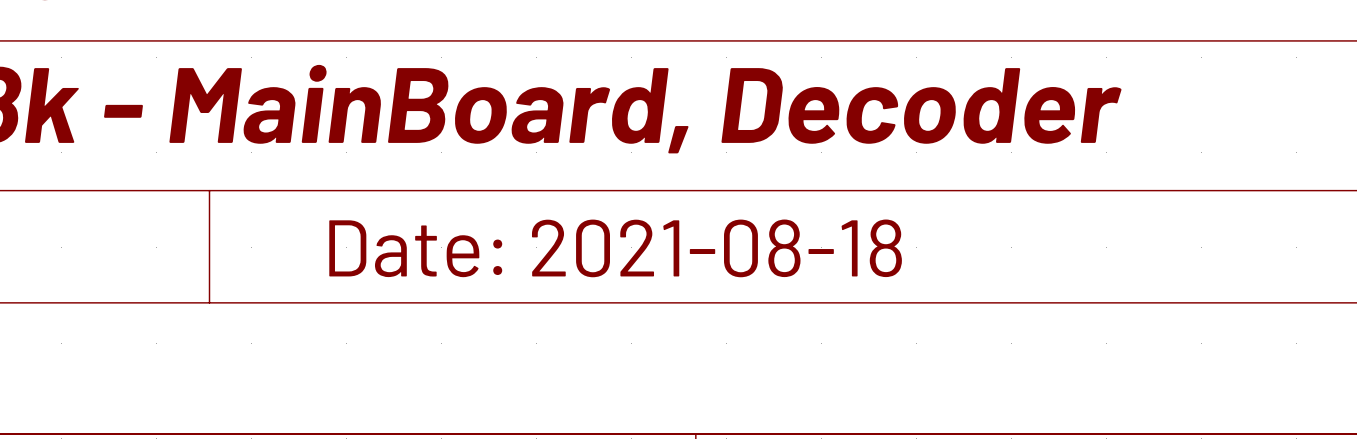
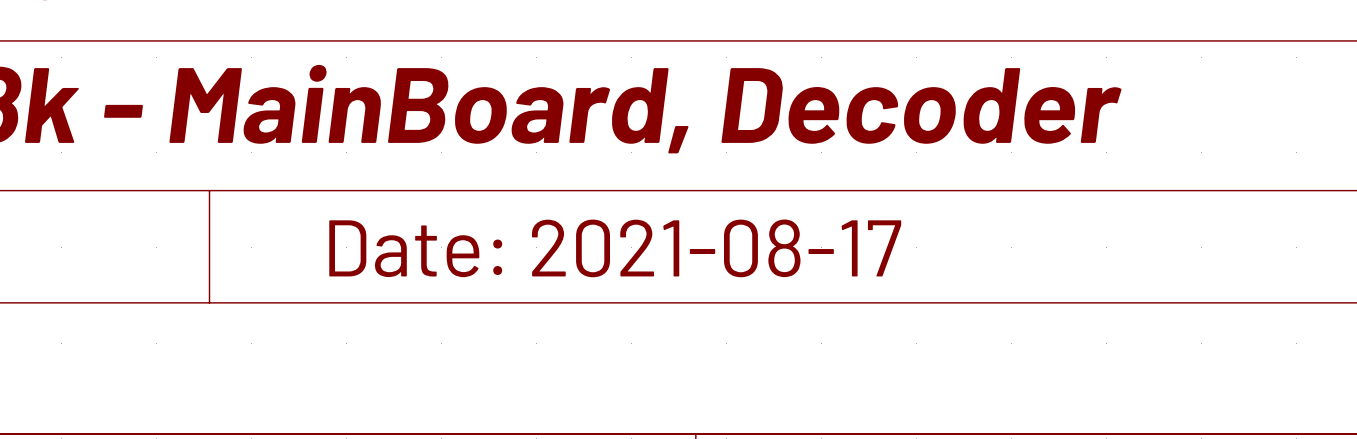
title block: Date: 2021-08-18 (615, 248) -> Date: 2021-08-17 (615, 248)

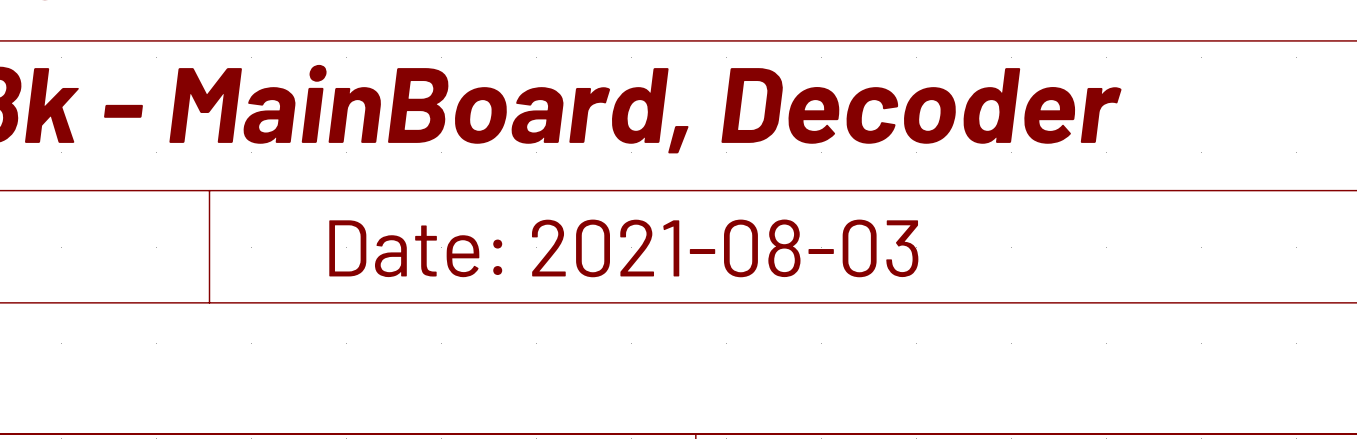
title block: Date: 2021-08-17 (615, 248) -> Date: 2021-08-03 (623, 248)

